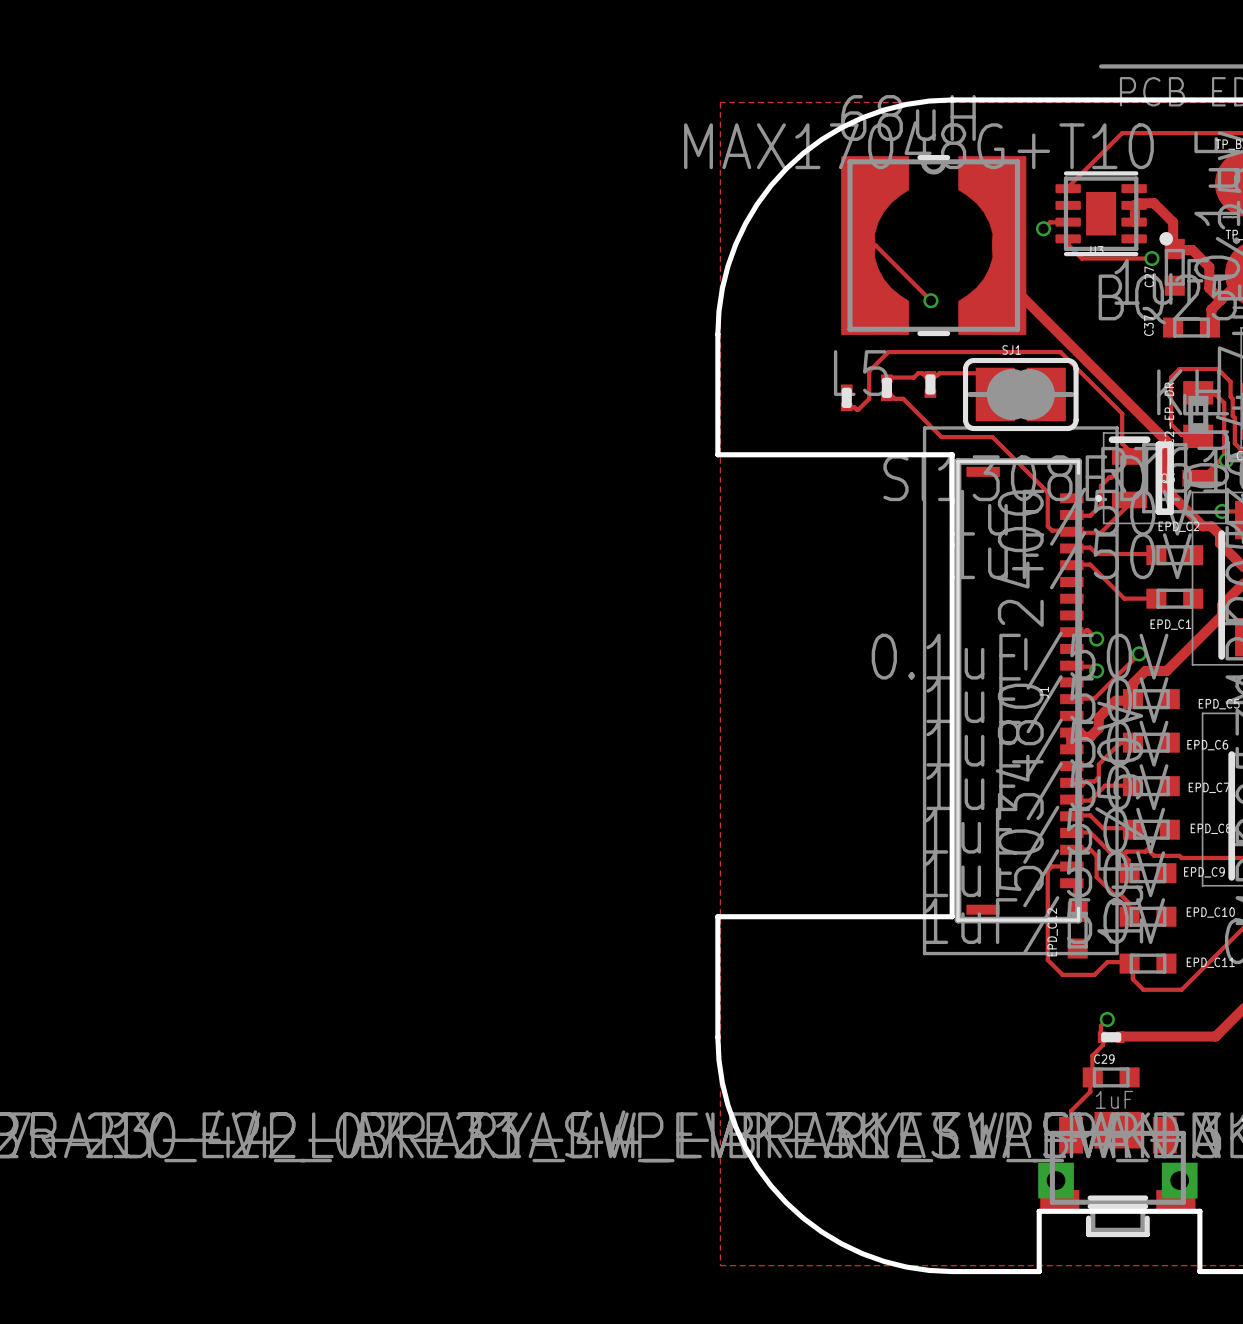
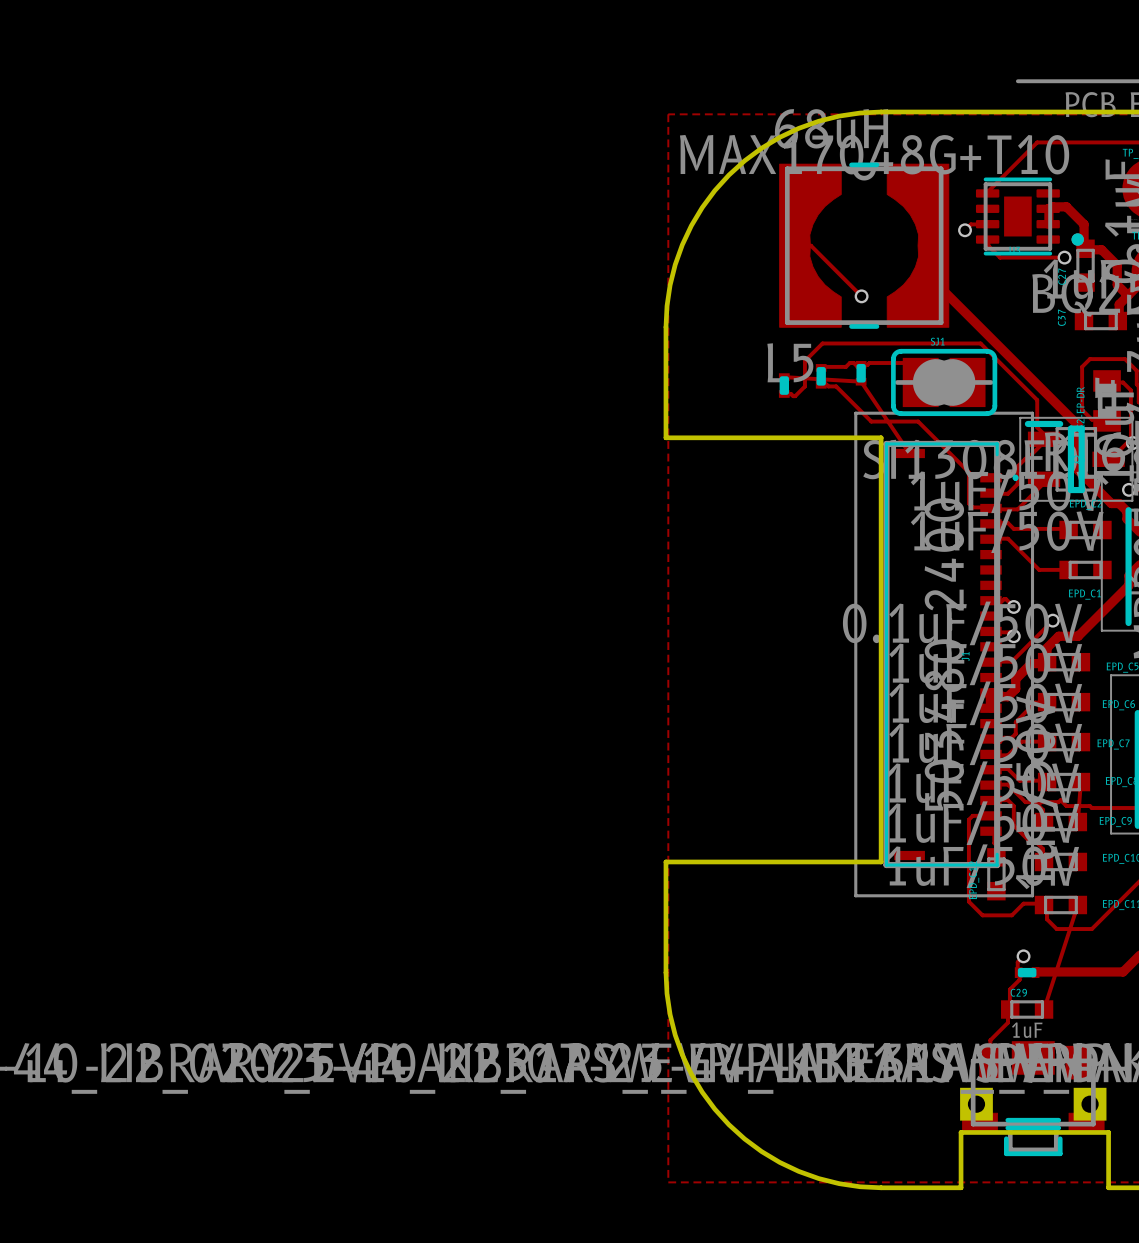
track: none -> (784, 377) (861, 381) (909, 453)
track: none -> (1080, 782) (1077, 822)
track: none -> (1077, 905) (1044, 1009)

